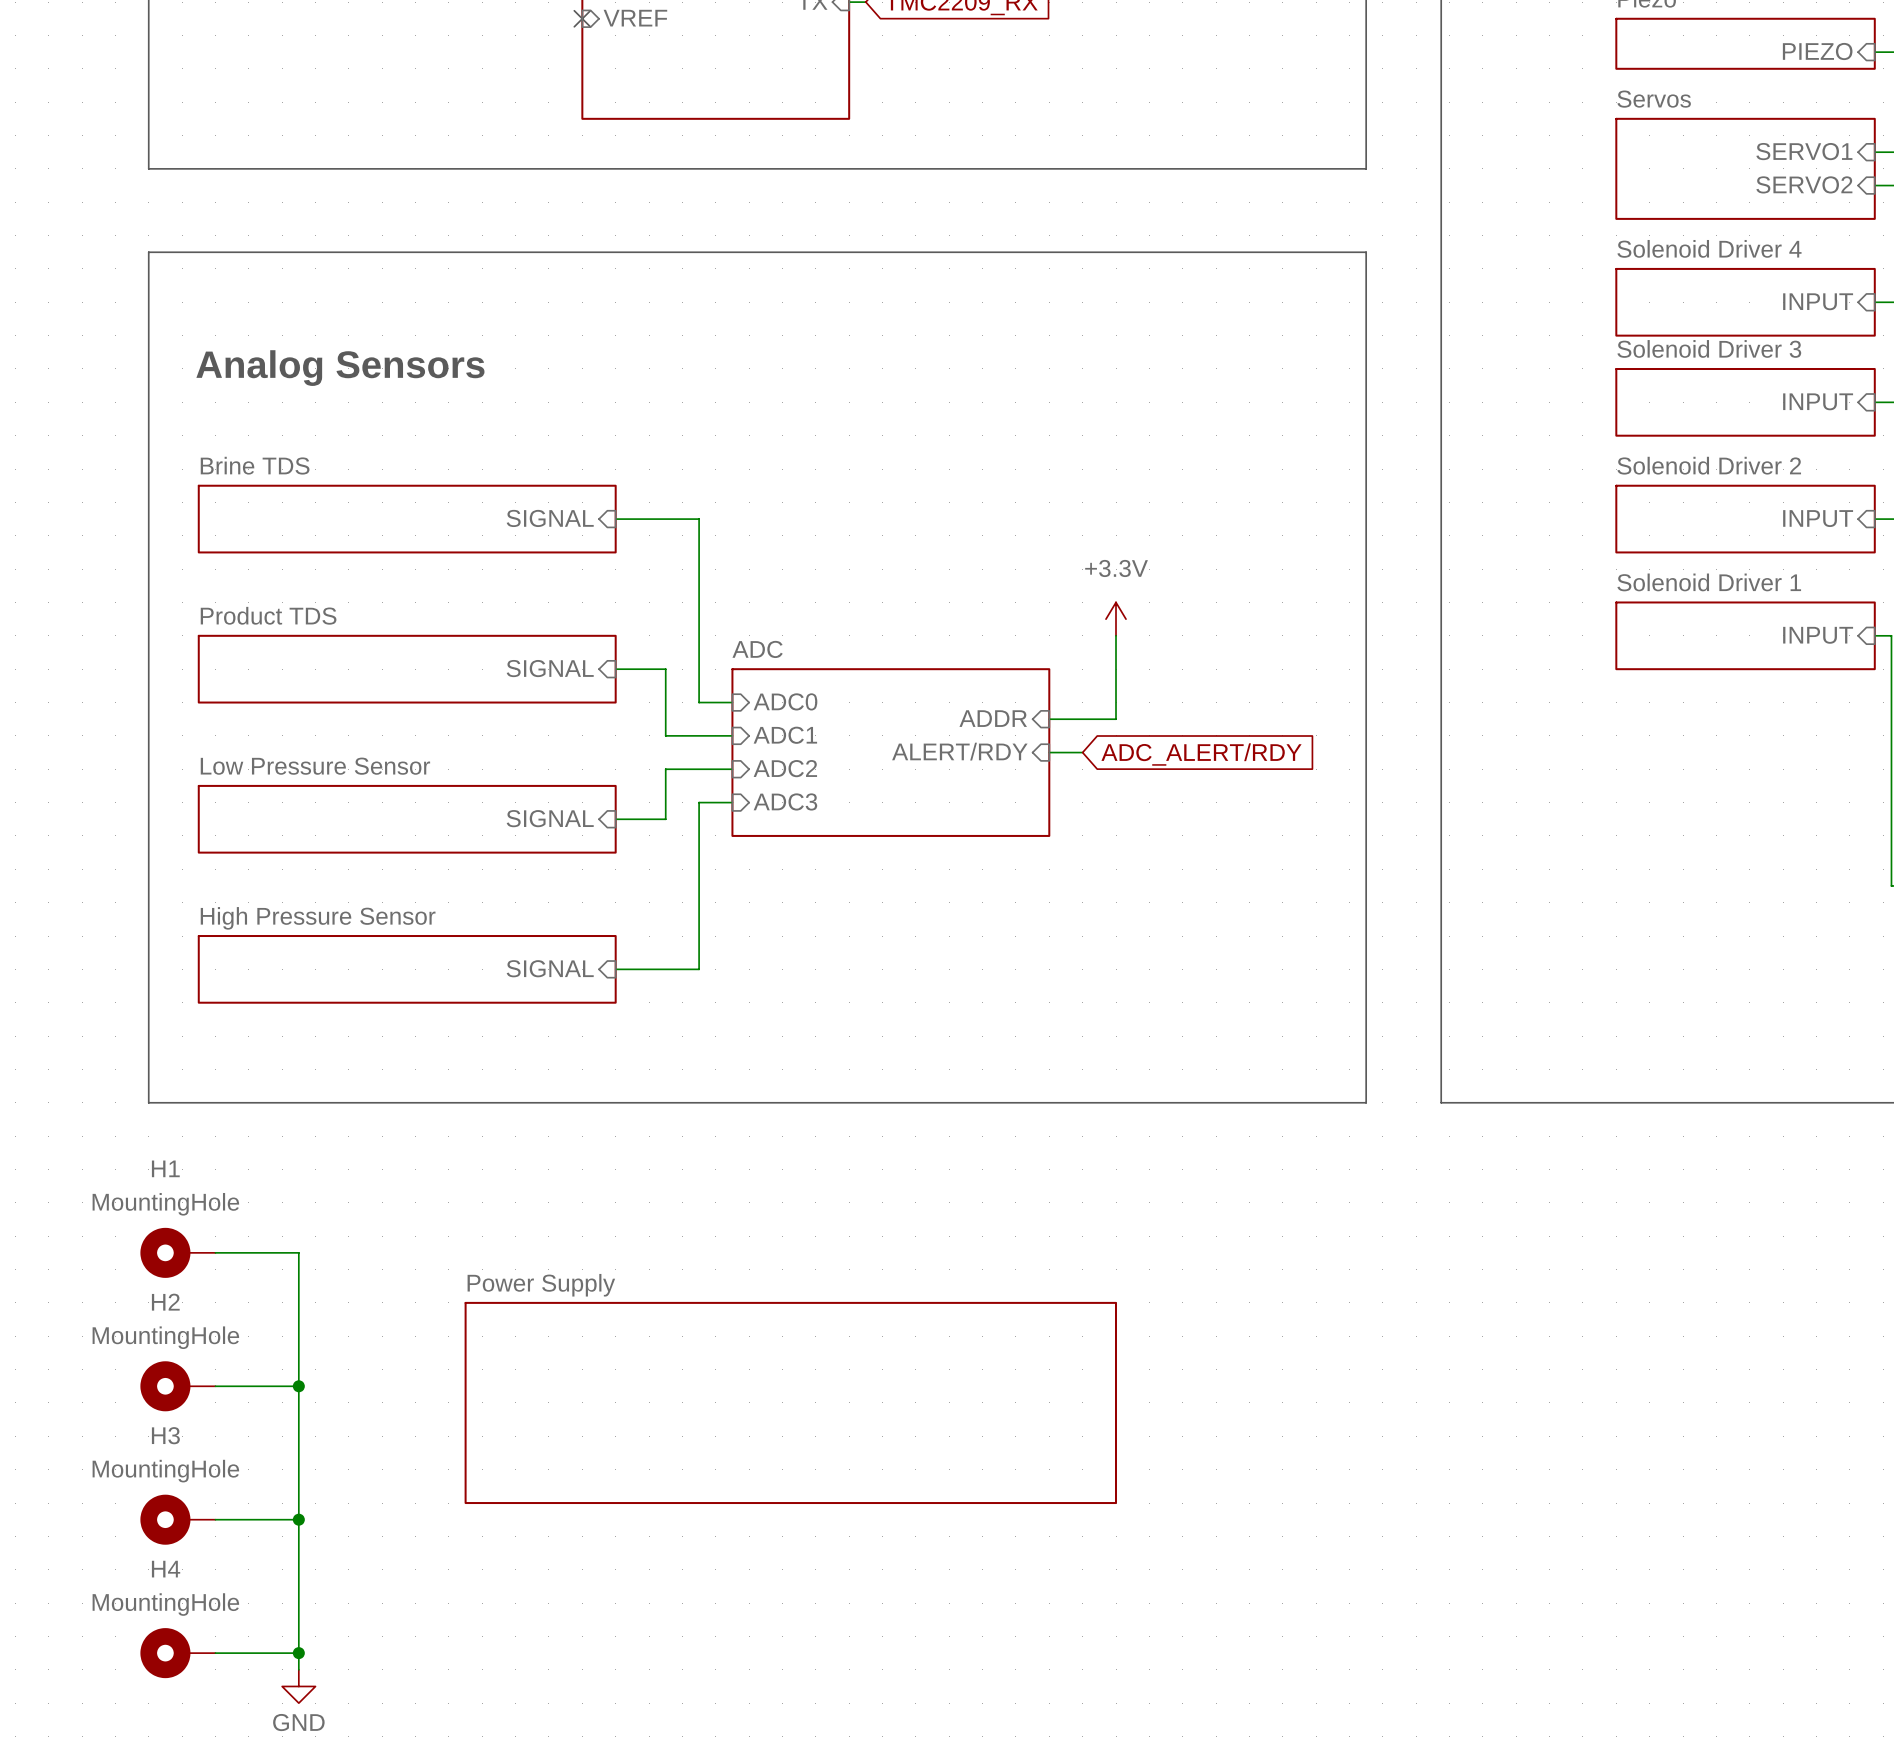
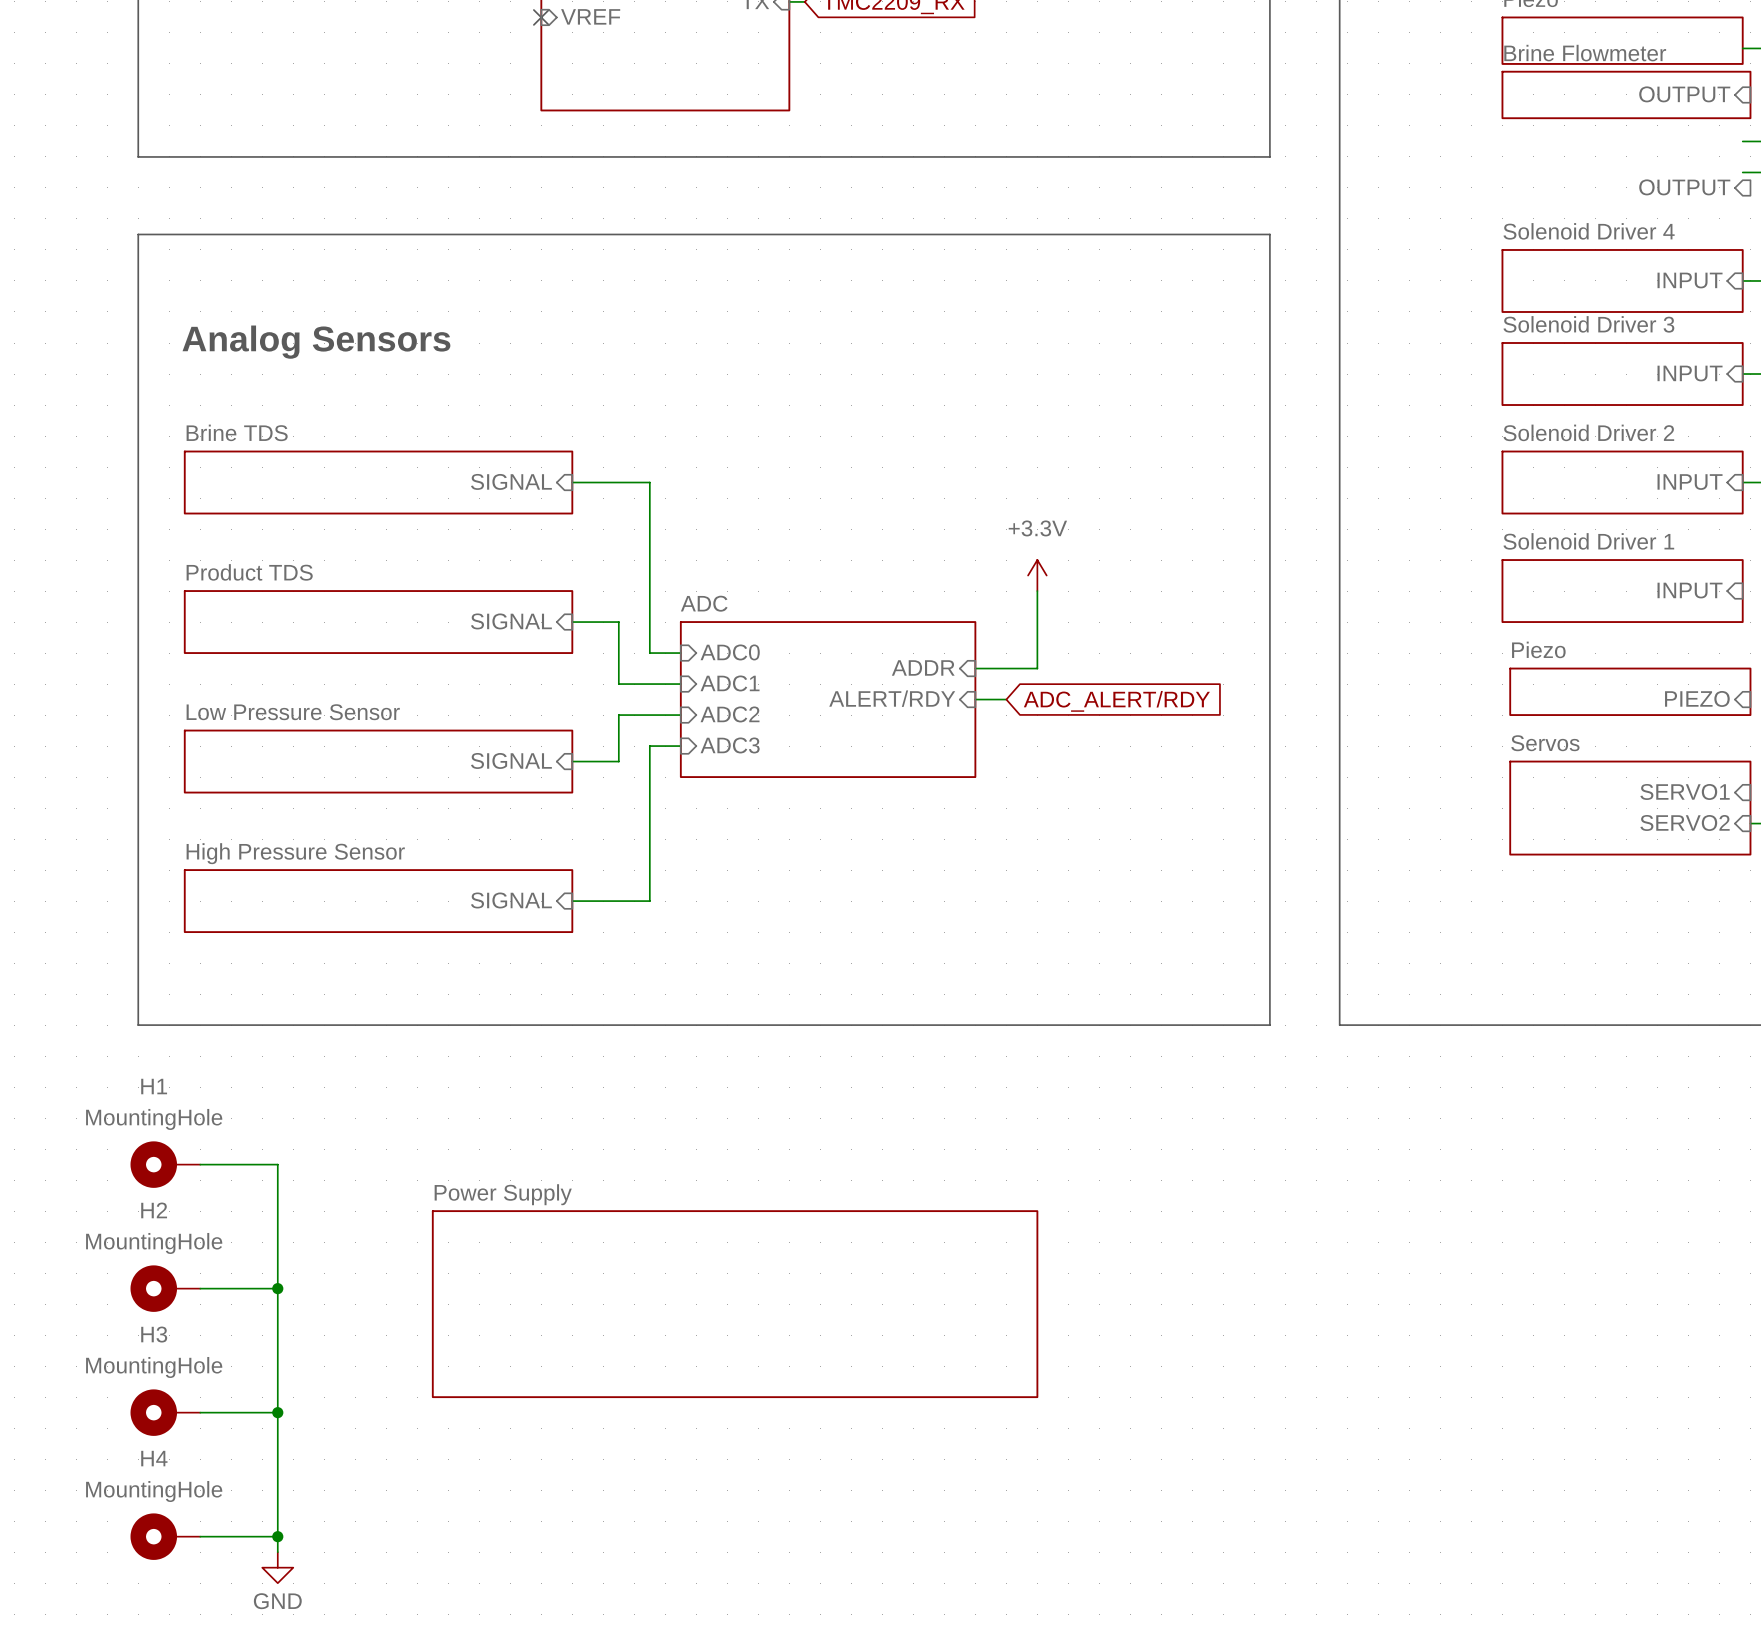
sheet pin: PIEZO (1817, 51) -> none
sheet pin: none -> OUTPUT (1684, 94)
sheet Brine Flowmeter: none -> (1626, 94)
sheet pin: SERVO1 (1804, 151) -> none
sheet Servos: (1745, 168) -> none
sheet pin: SERVO2 (1804, 184) -> none
sheet pin: none -> OUTPUT (1684, 187)
wire: (1874, 635) (1891, 635) (1891, 885) -> (1750, 823) (1758, 823)
sheet Piezo: none -> (1630, 691)
sheet pin: none -> PIEZO (1697, 698)
sheet pin: none -> SERVO1 (1685, 791)
sheet Servos: none -> (1630, 808)
sheet pin: none -> SERVO2 (1685, 822)

